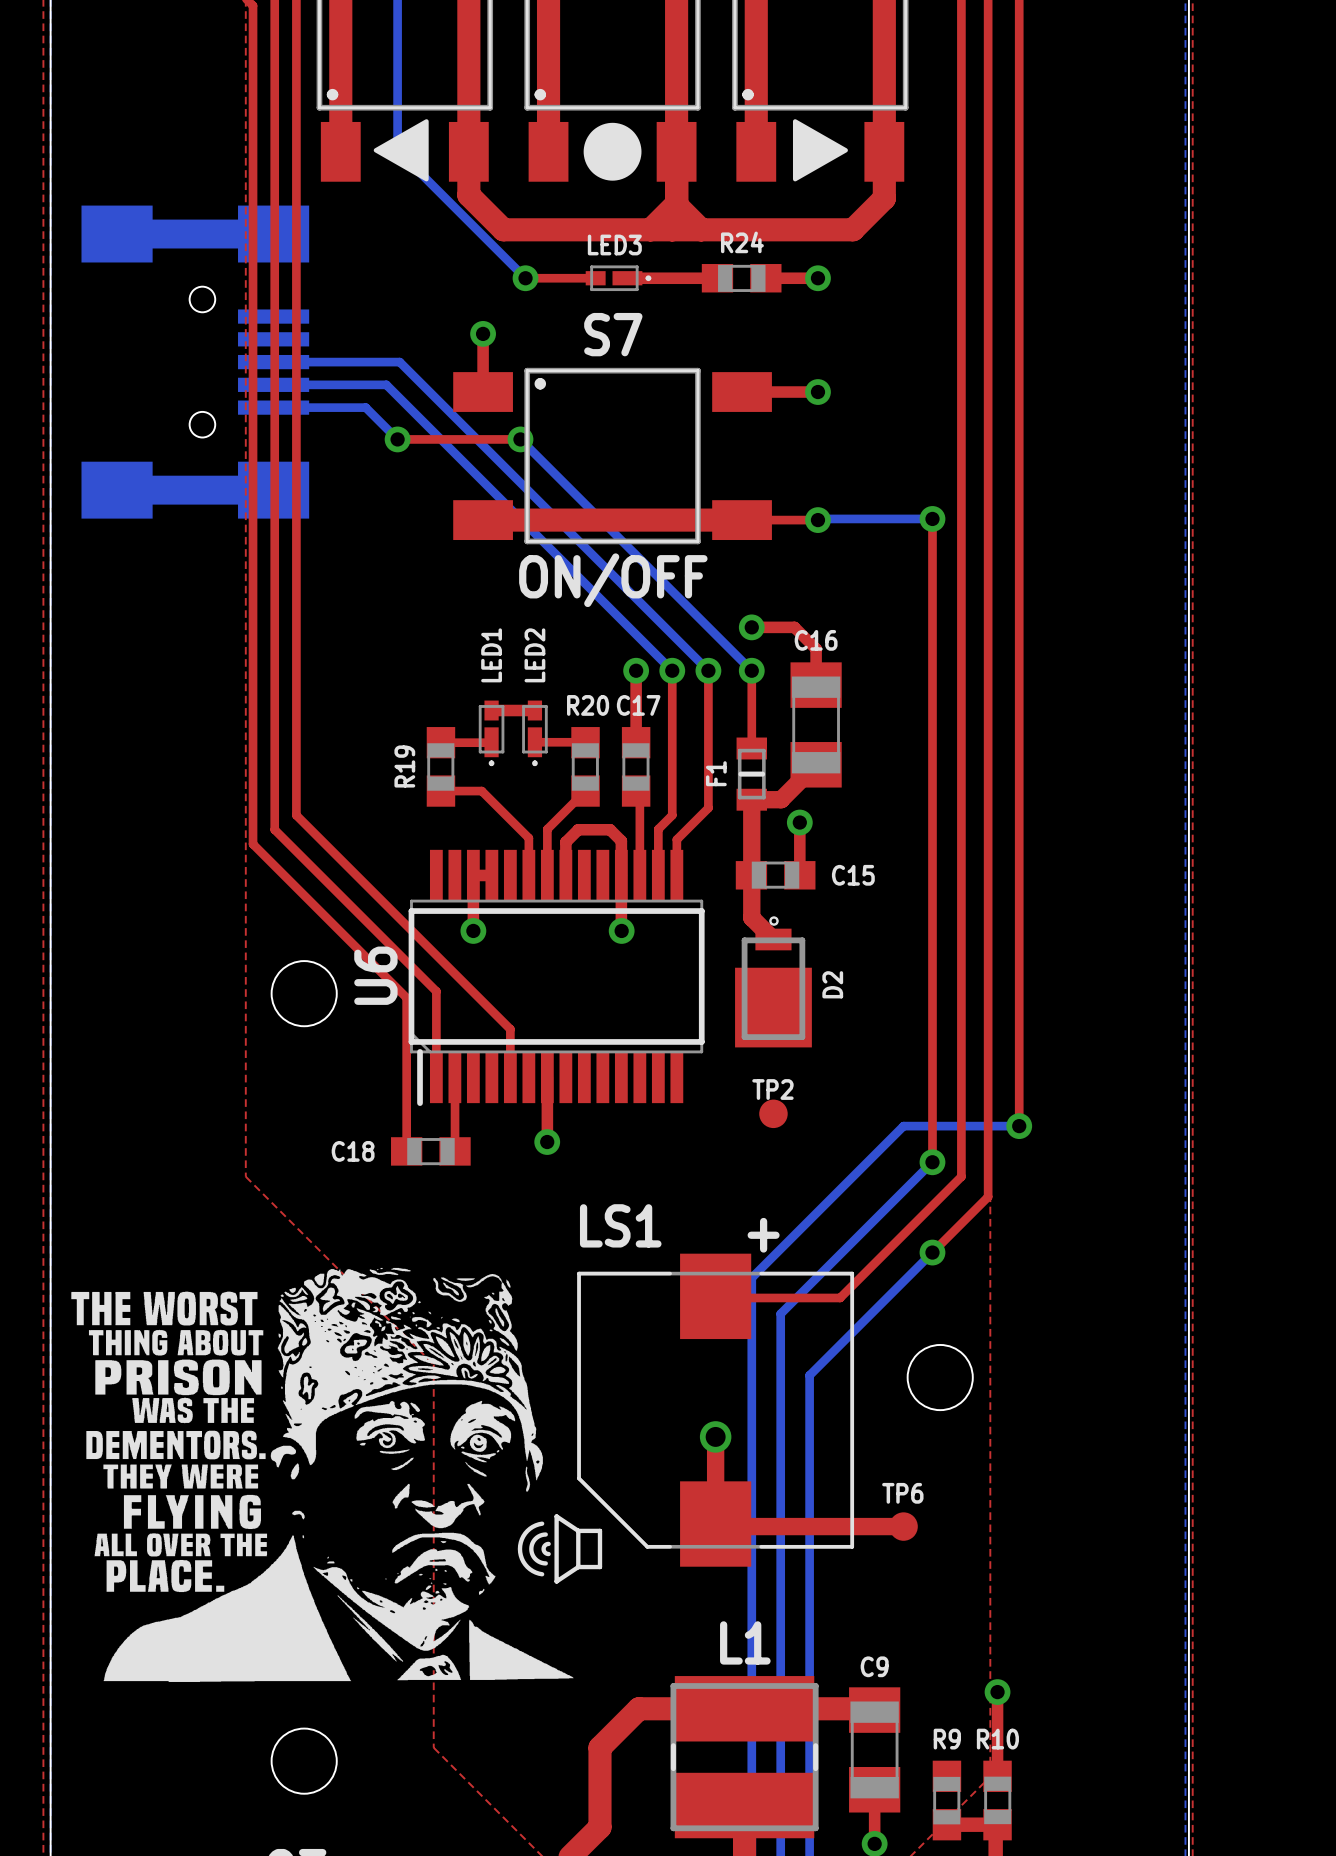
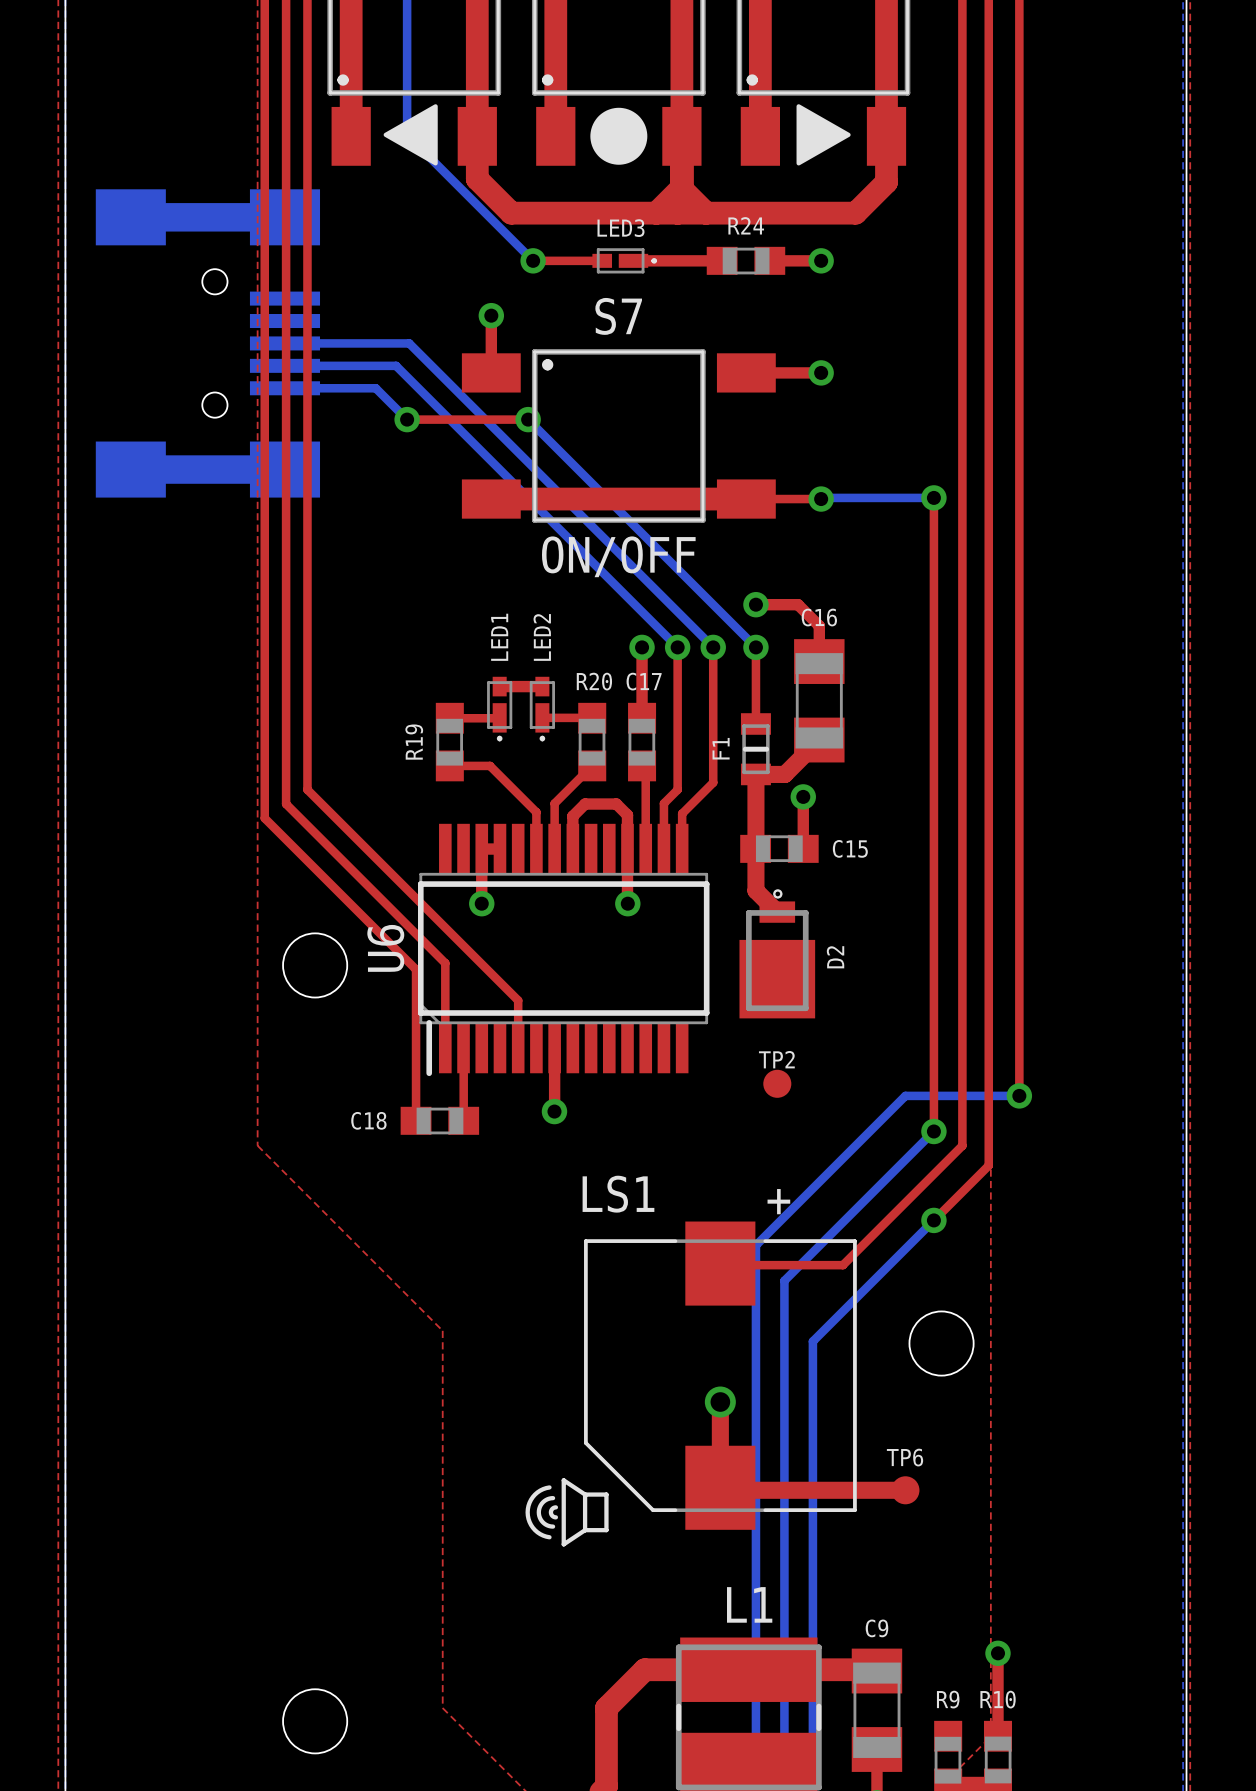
drawing: [71, 1267, 574, 1682] -> none

